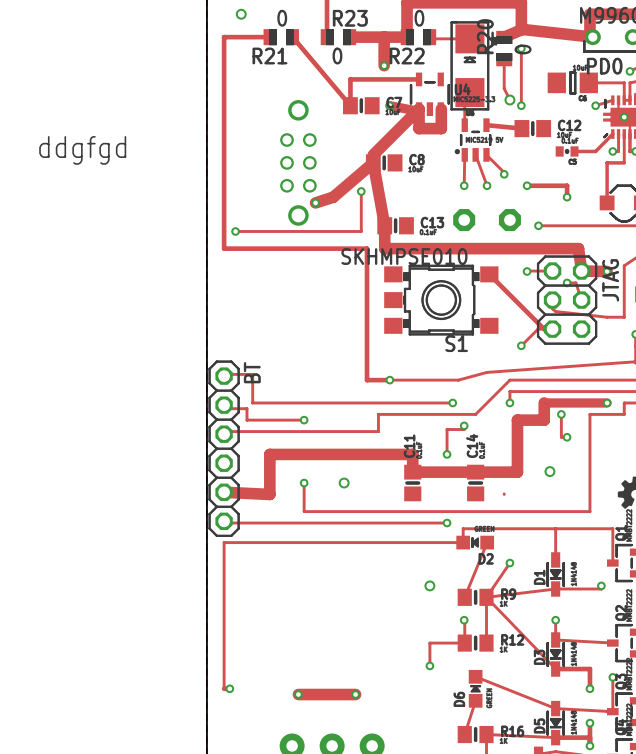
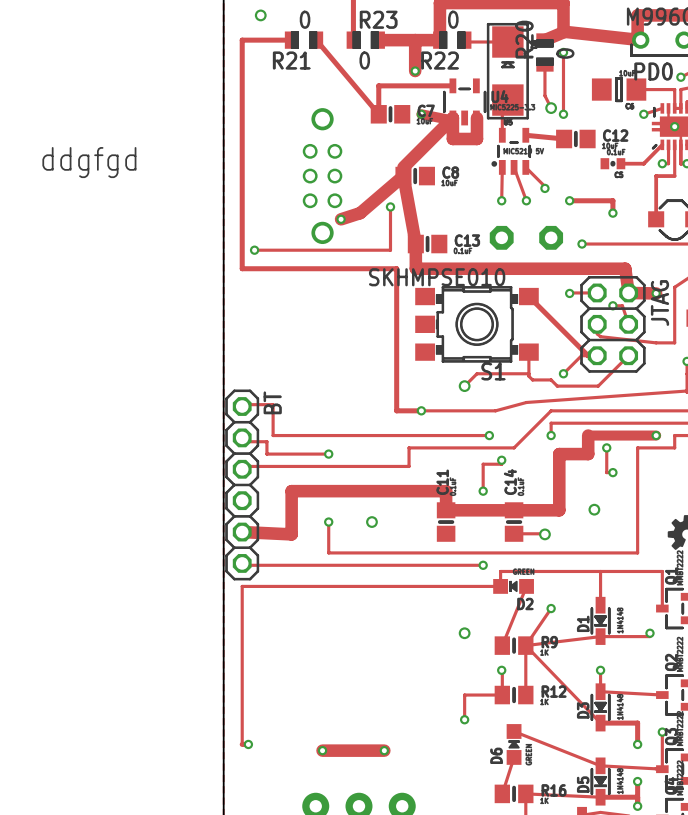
track: none -> (528, 352) (528, 376) (532, 379) (551, 379) (557, 386) (598, 386) (628, 355)
track: none -> (528, 373) (476, 373) (464, 386)
via: none -> (464, 386)
track: none -> (514, 533) (544, 533)
via: none -> (544, 534)

